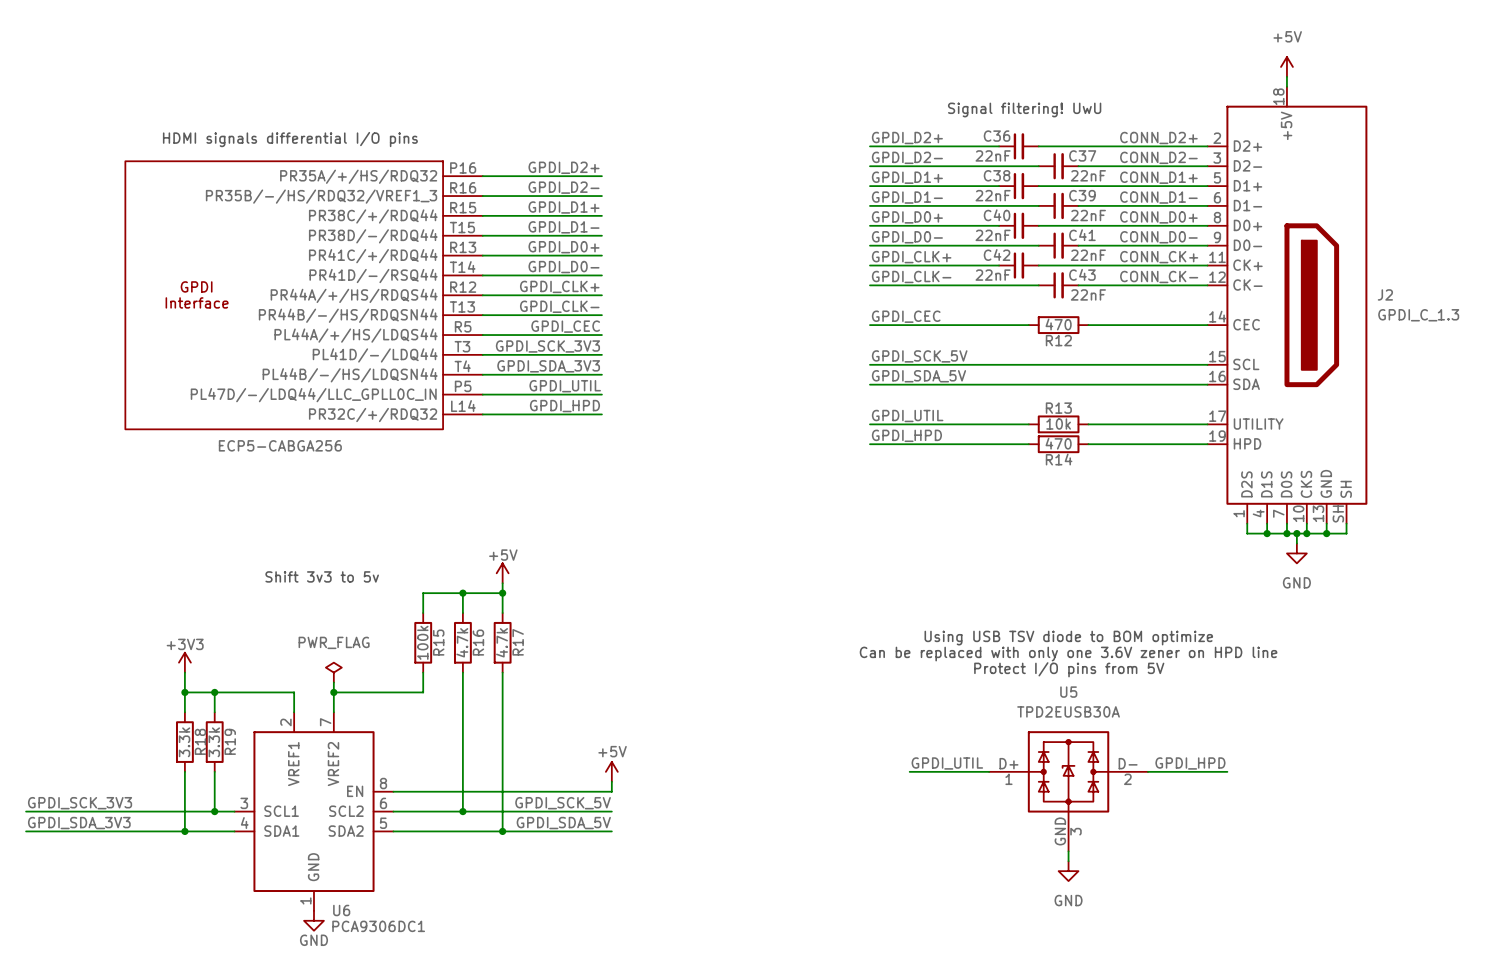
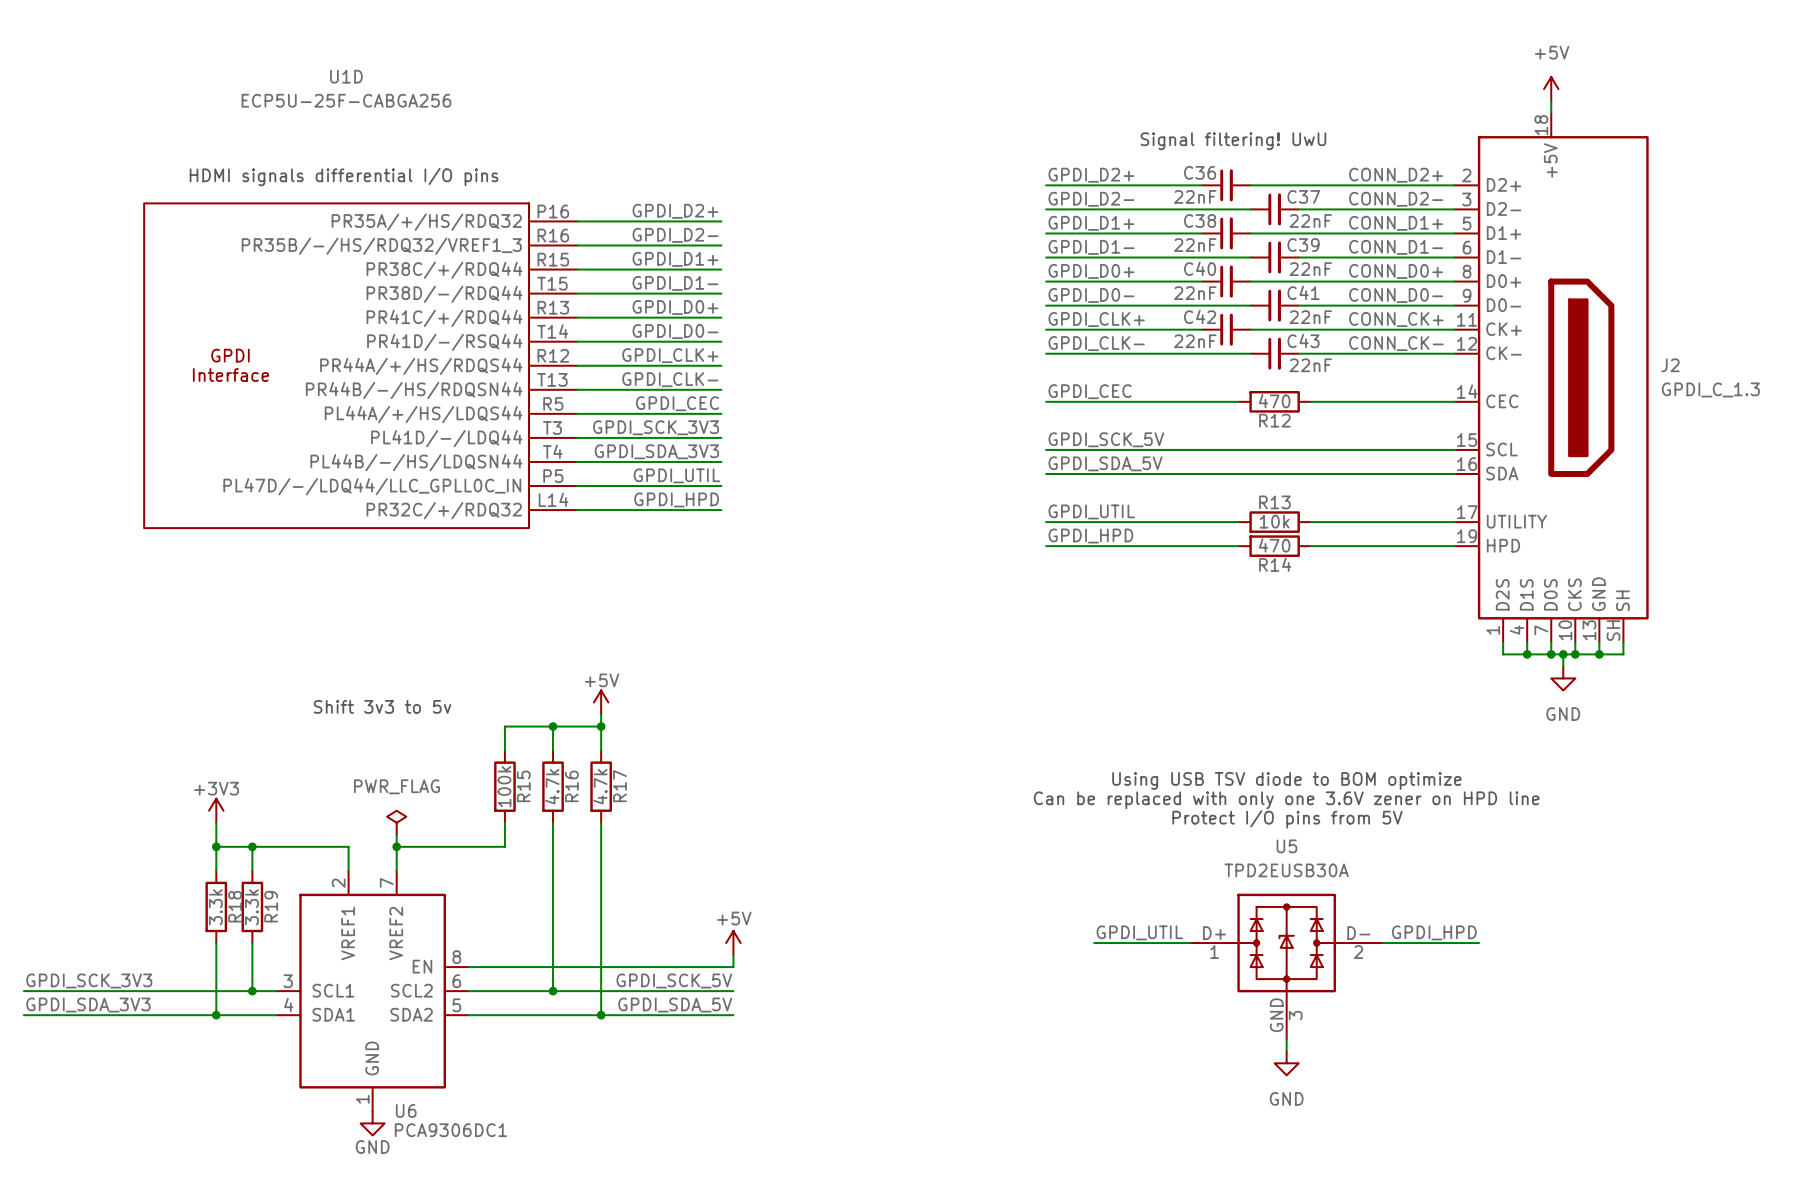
U1D name: none -> U1D (346, 76)
U1D value: ECP5-CABGA256 (280, 445) -> ECP5U-25F-CABGA256 (346, 100)

